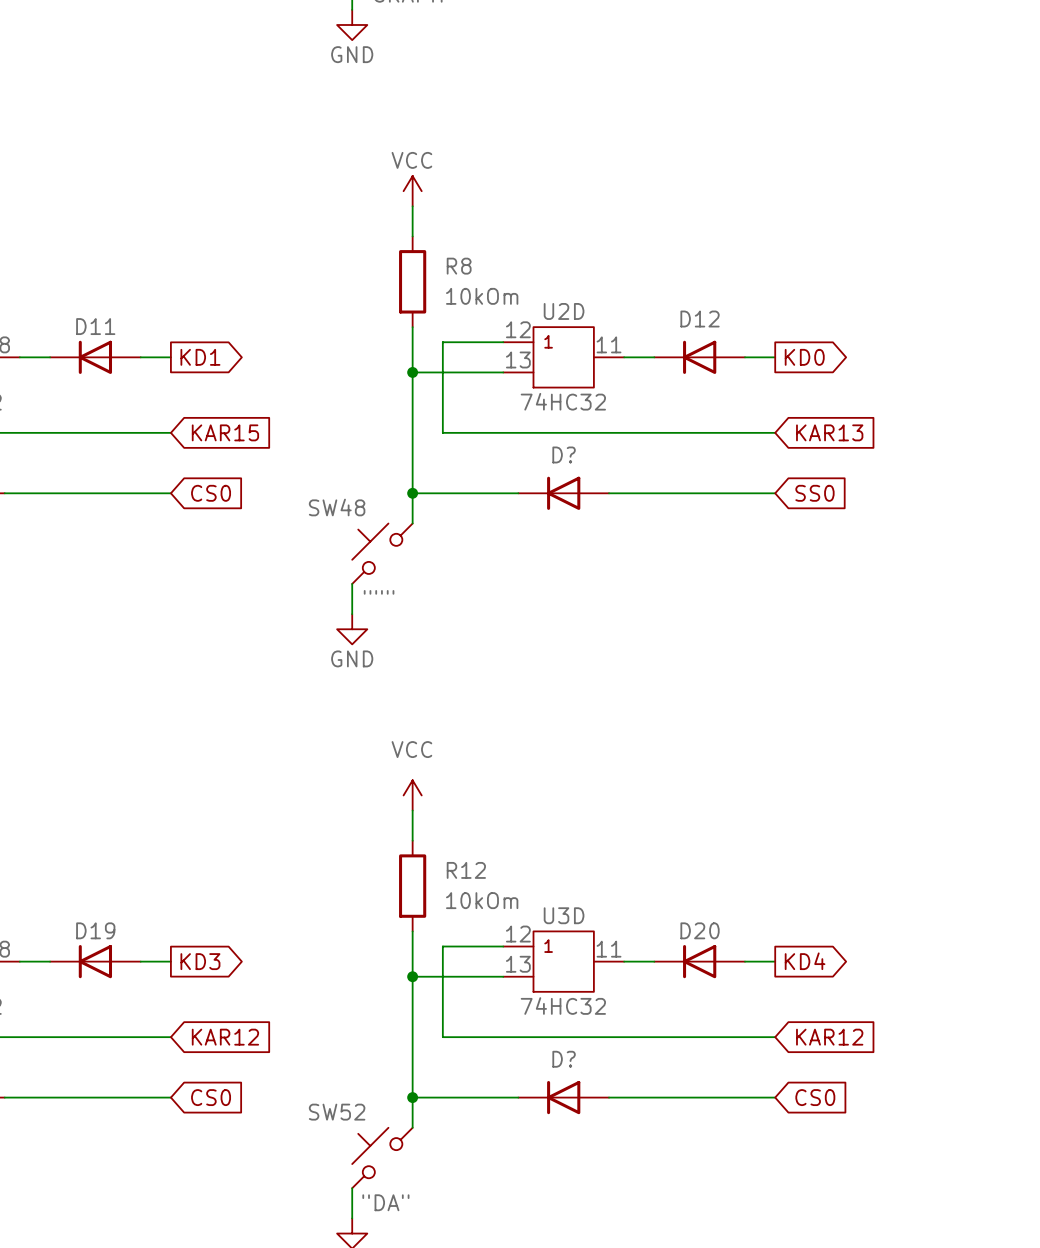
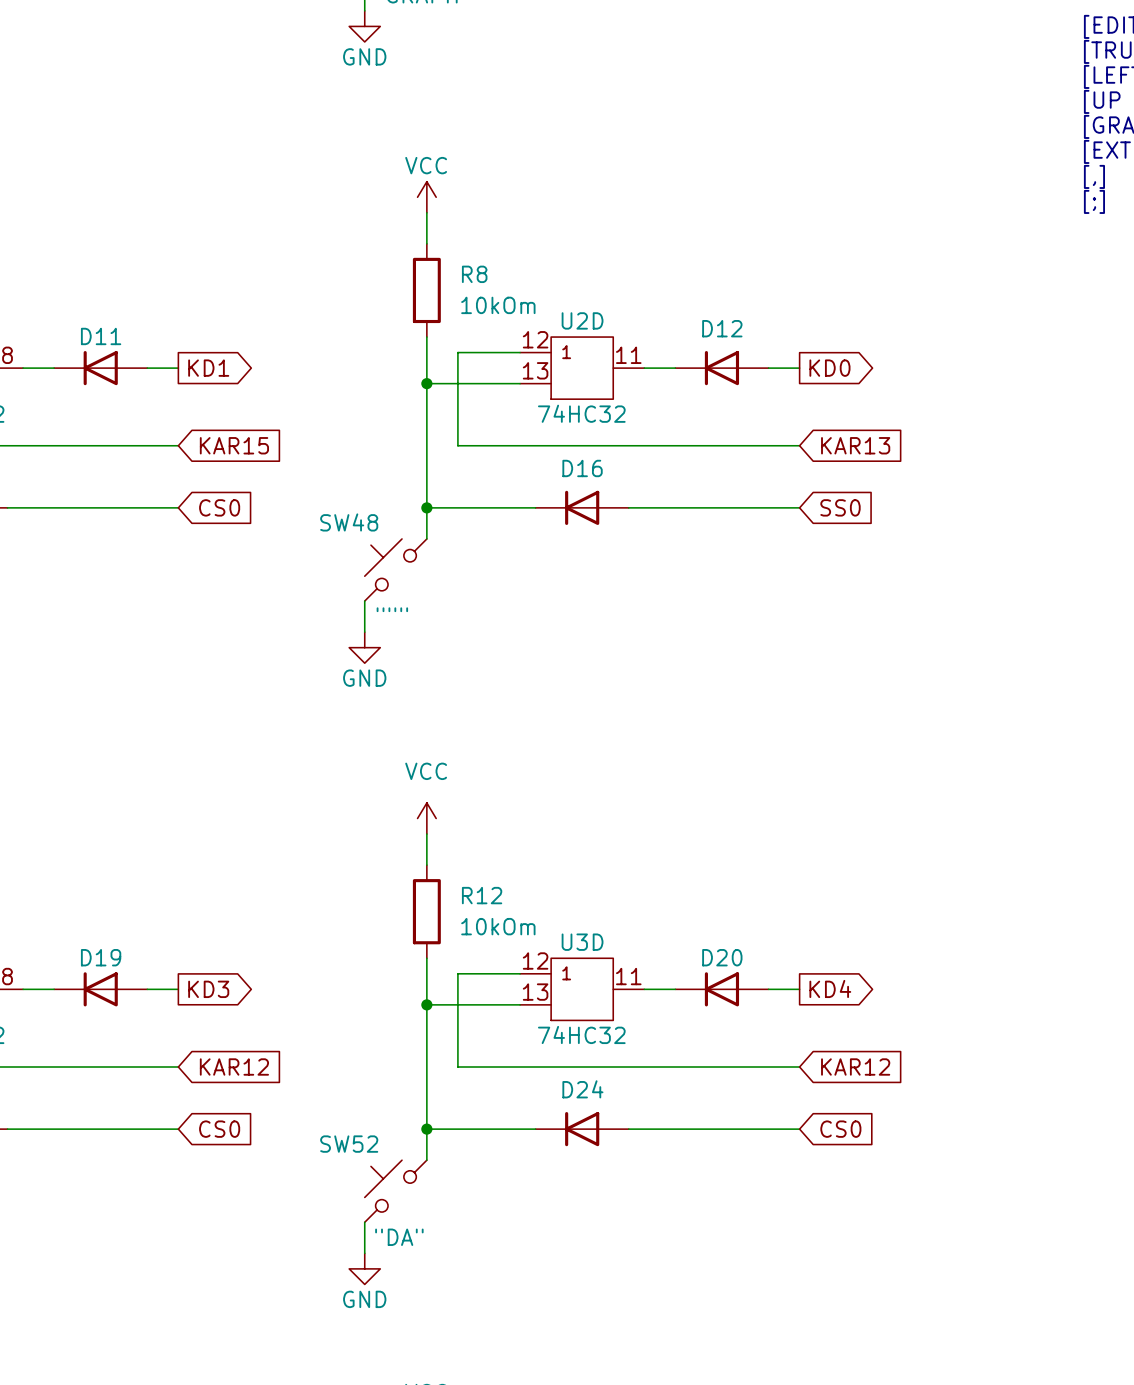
D? name: D? (564, 454) -> D16 (582, 468)
D? name: D? (564, 1059) -> D24 (582, 1089)

